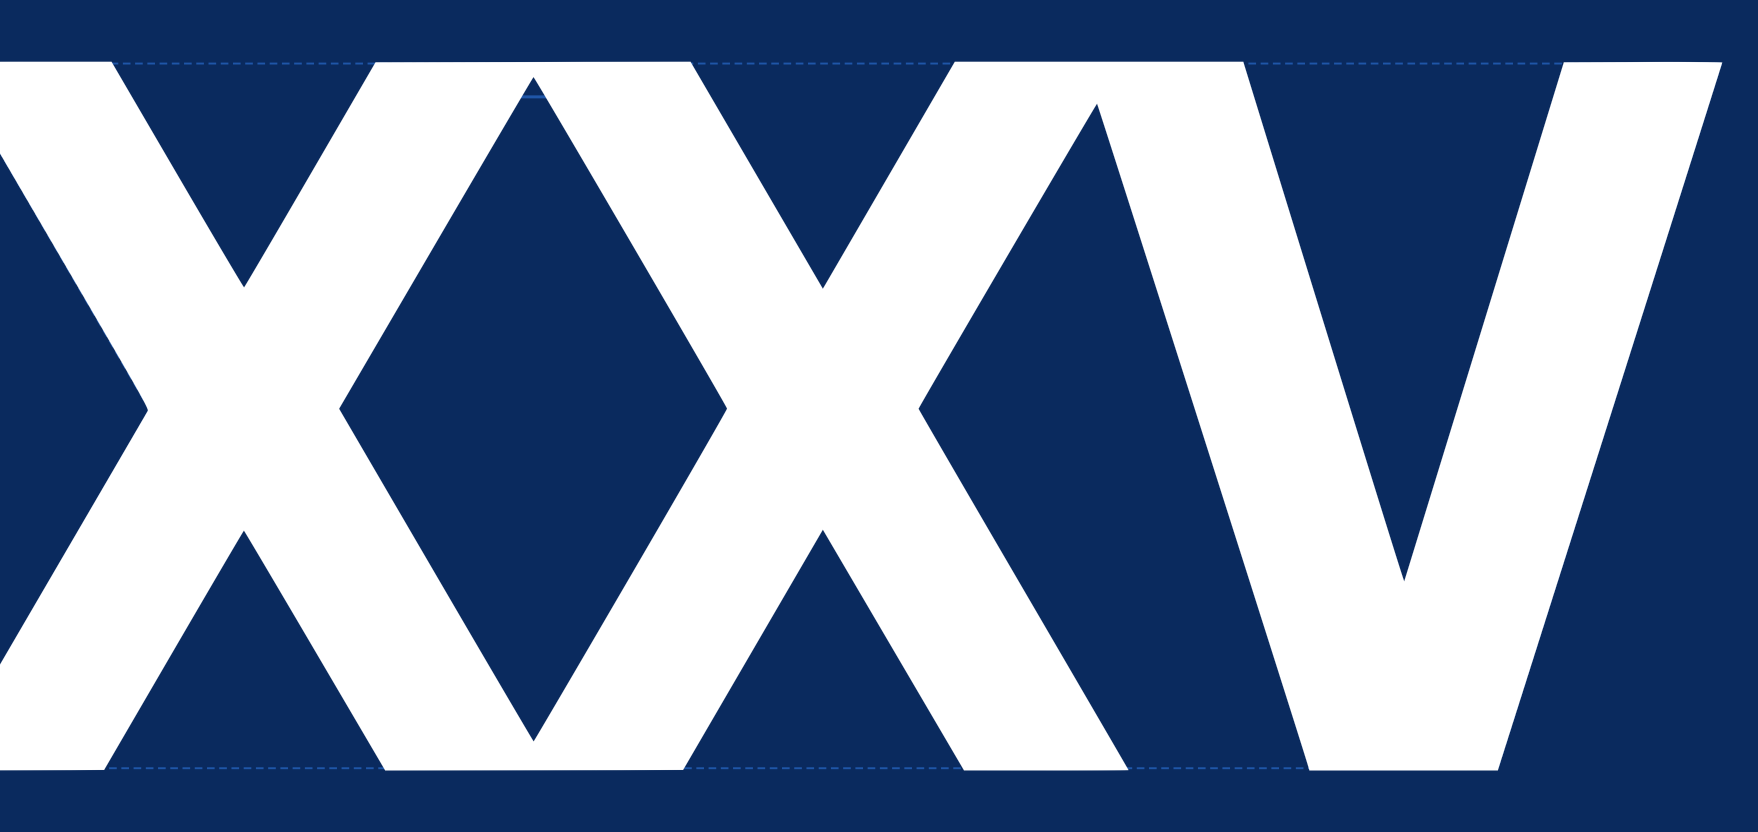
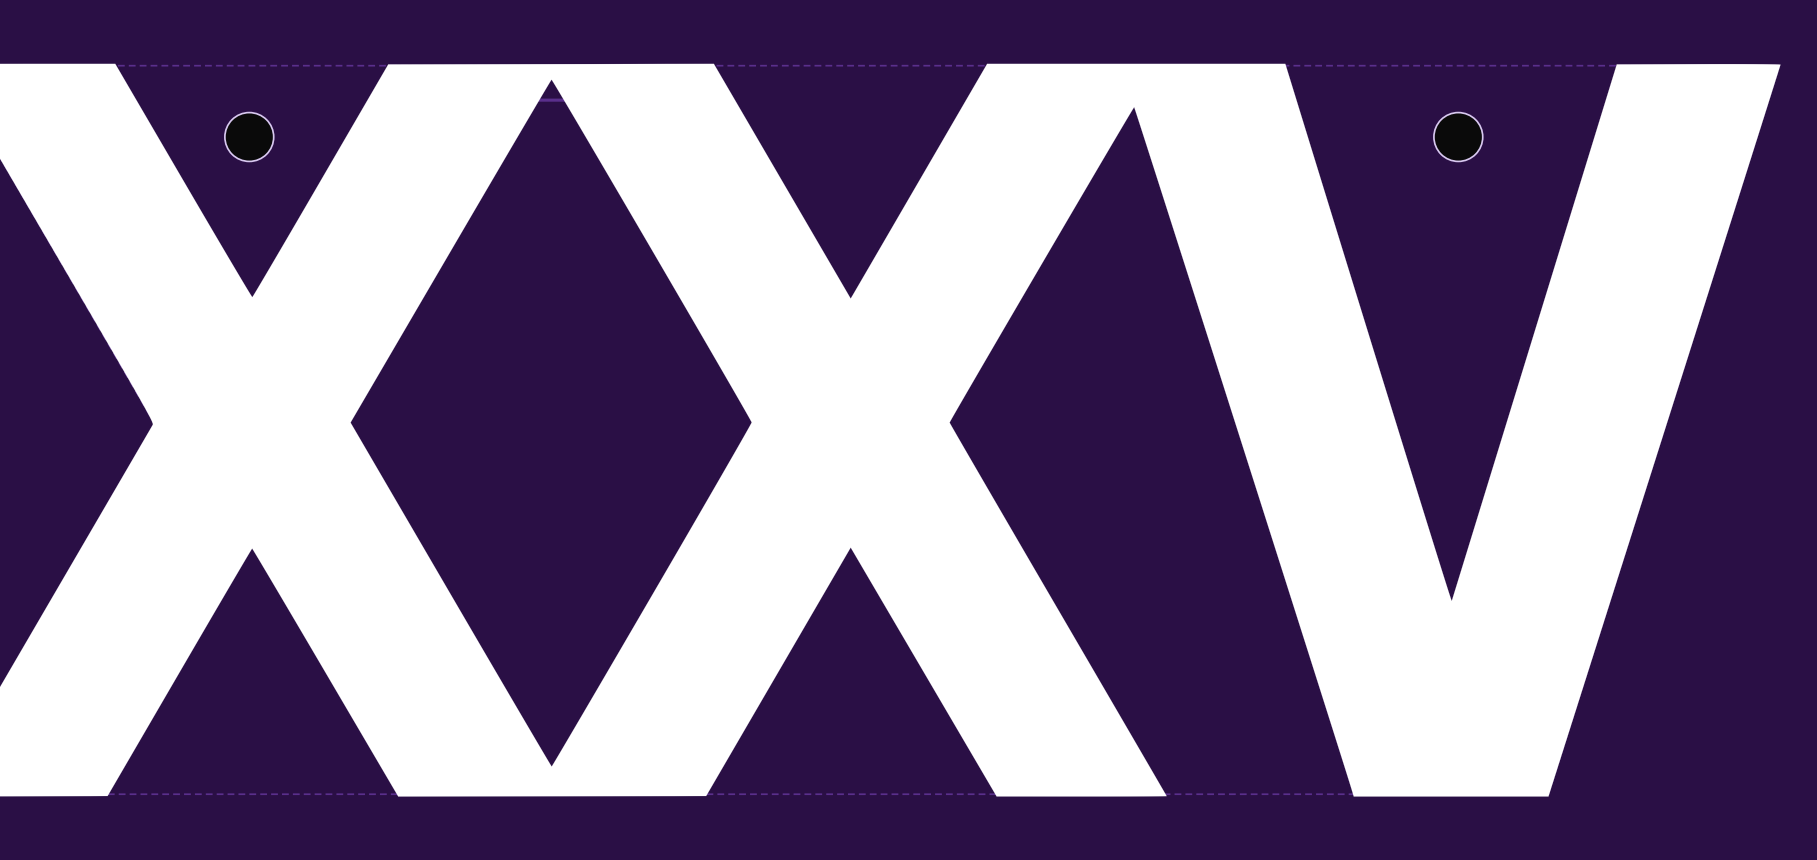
part: none -> (249, 137)
part: none -> (1458, 137)

